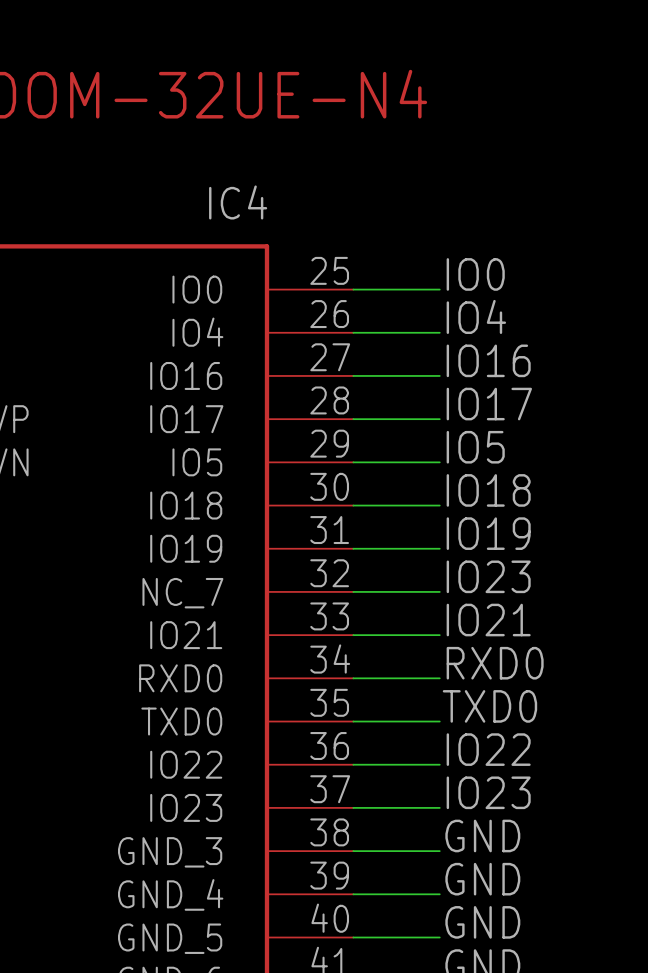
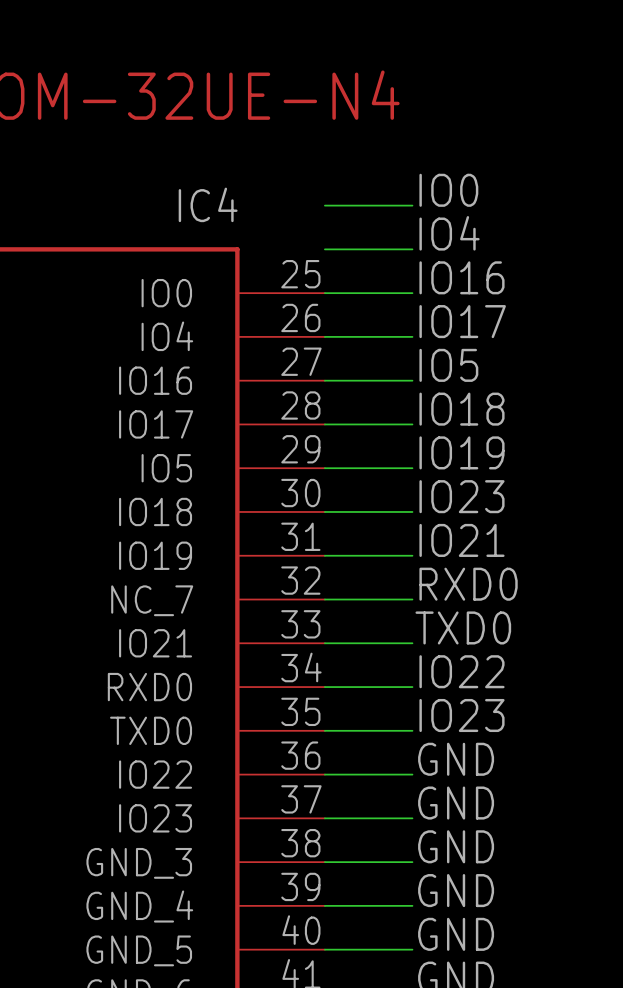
label: none -> IO0 (448, 190)
wire: none -> (324, 205) (412, 205)
label: none -> IO4 (449, 233)
wire: none -> (324, 249) (412, 249)
label: IO0 (475, 274) -> IO16 (461, 277)
label: IO4 (476, 316) -> IO17 (462, 321)
label: IO16 (488, 360) -> IO5 (448, 365)
label: IO17 (489, 404) -> IO18 (461, 409)
label: IO5 (475, 447) -> IO19 (461, 452)
label: IO18 (488, 490) -> IO23 (461, 496)
label: IO19 (488, 533) -> IO21 (461, 540)
label: IO23 (488, 576) -> RXD0 (468, 584)
label: IO21 (488, 620) -> TXD0 (463, 627)
label: RXD0 (495, 663) -> IO22 (461, 671)
label: TXD0 (489, 706) -> IO23 (461, 715)
label: IO22 (488, 749) -> GND (456, 759)
label: IO23 (488, 792) -> GND (456, 803)

